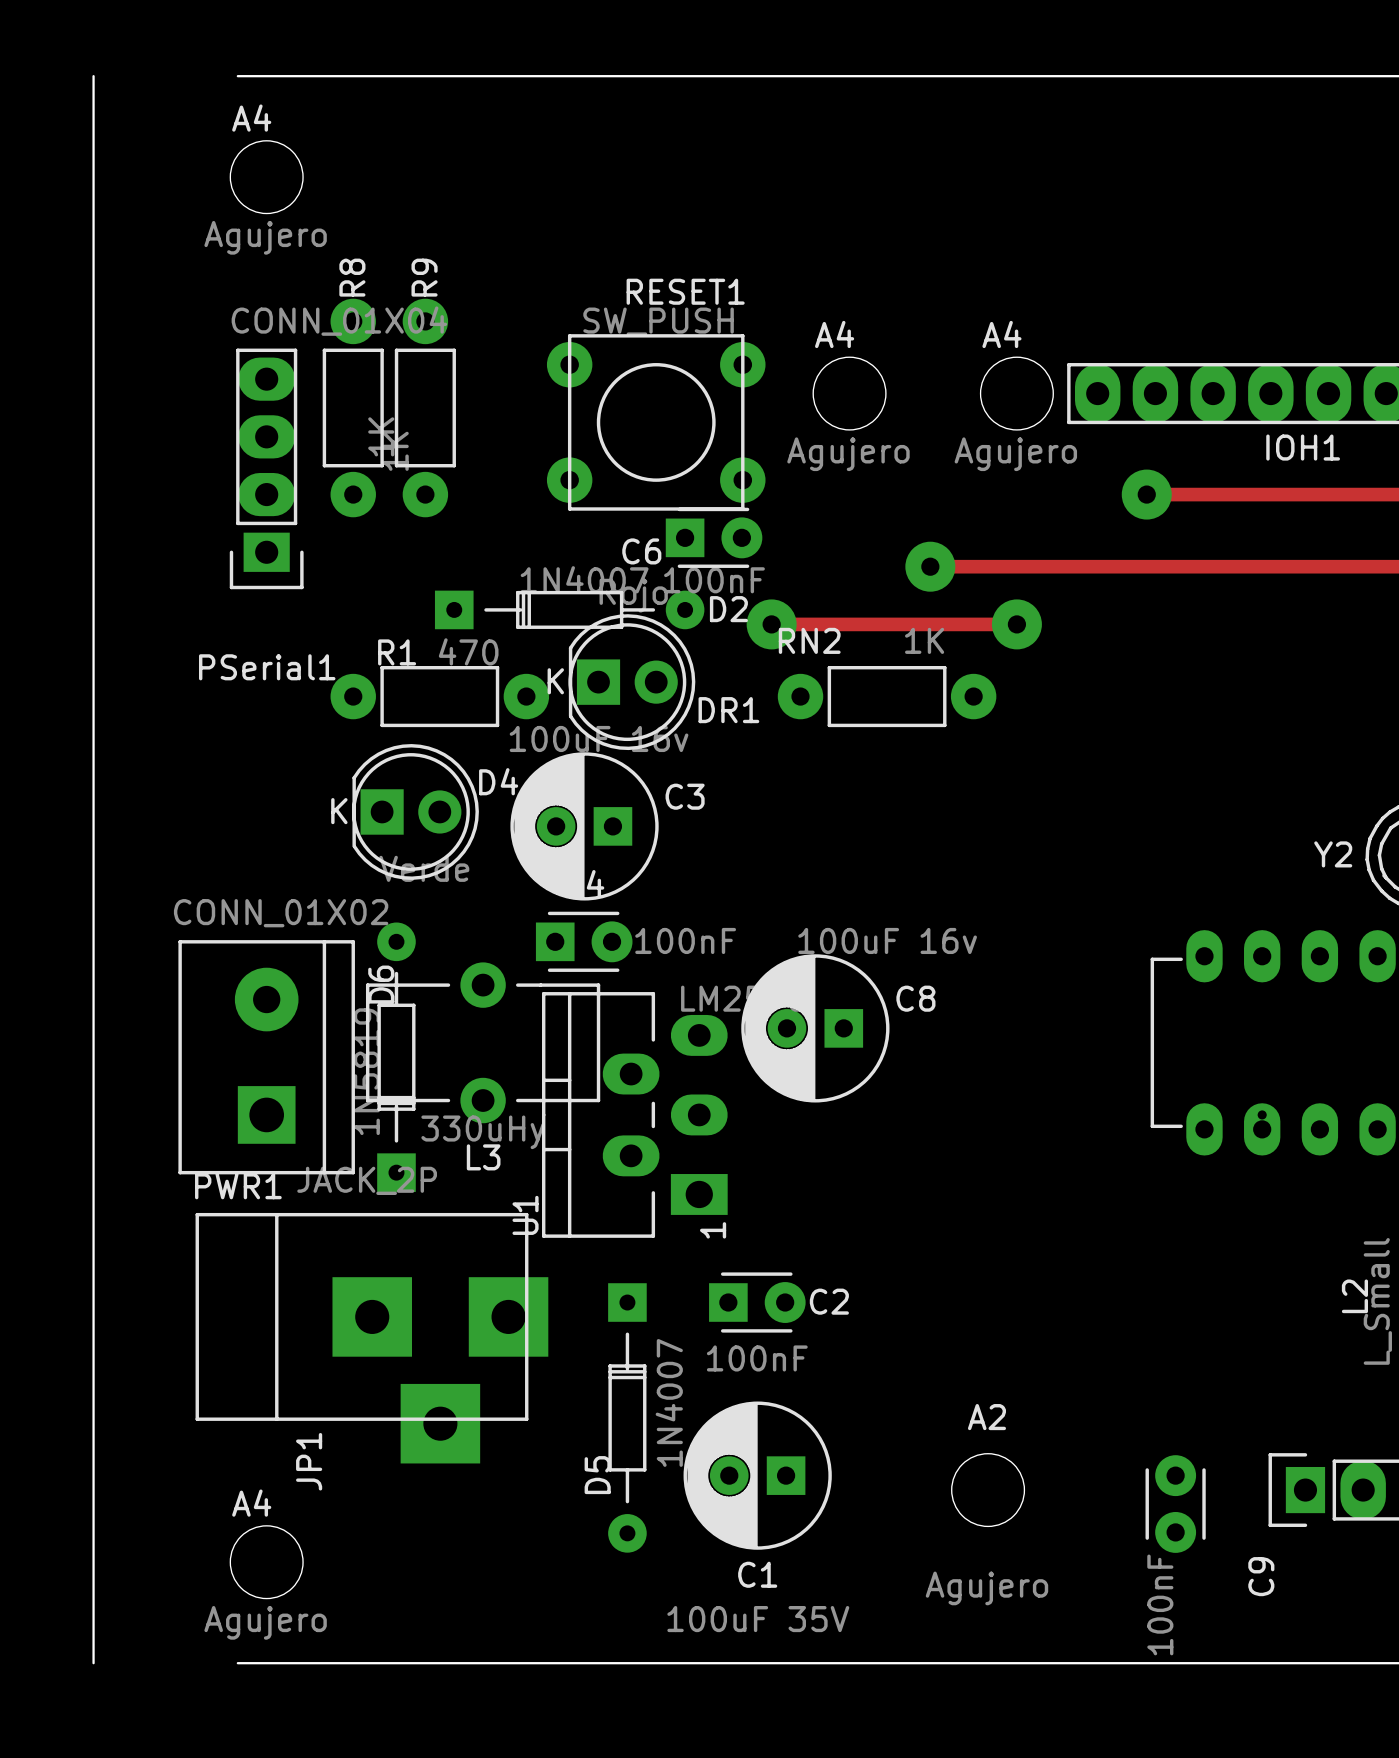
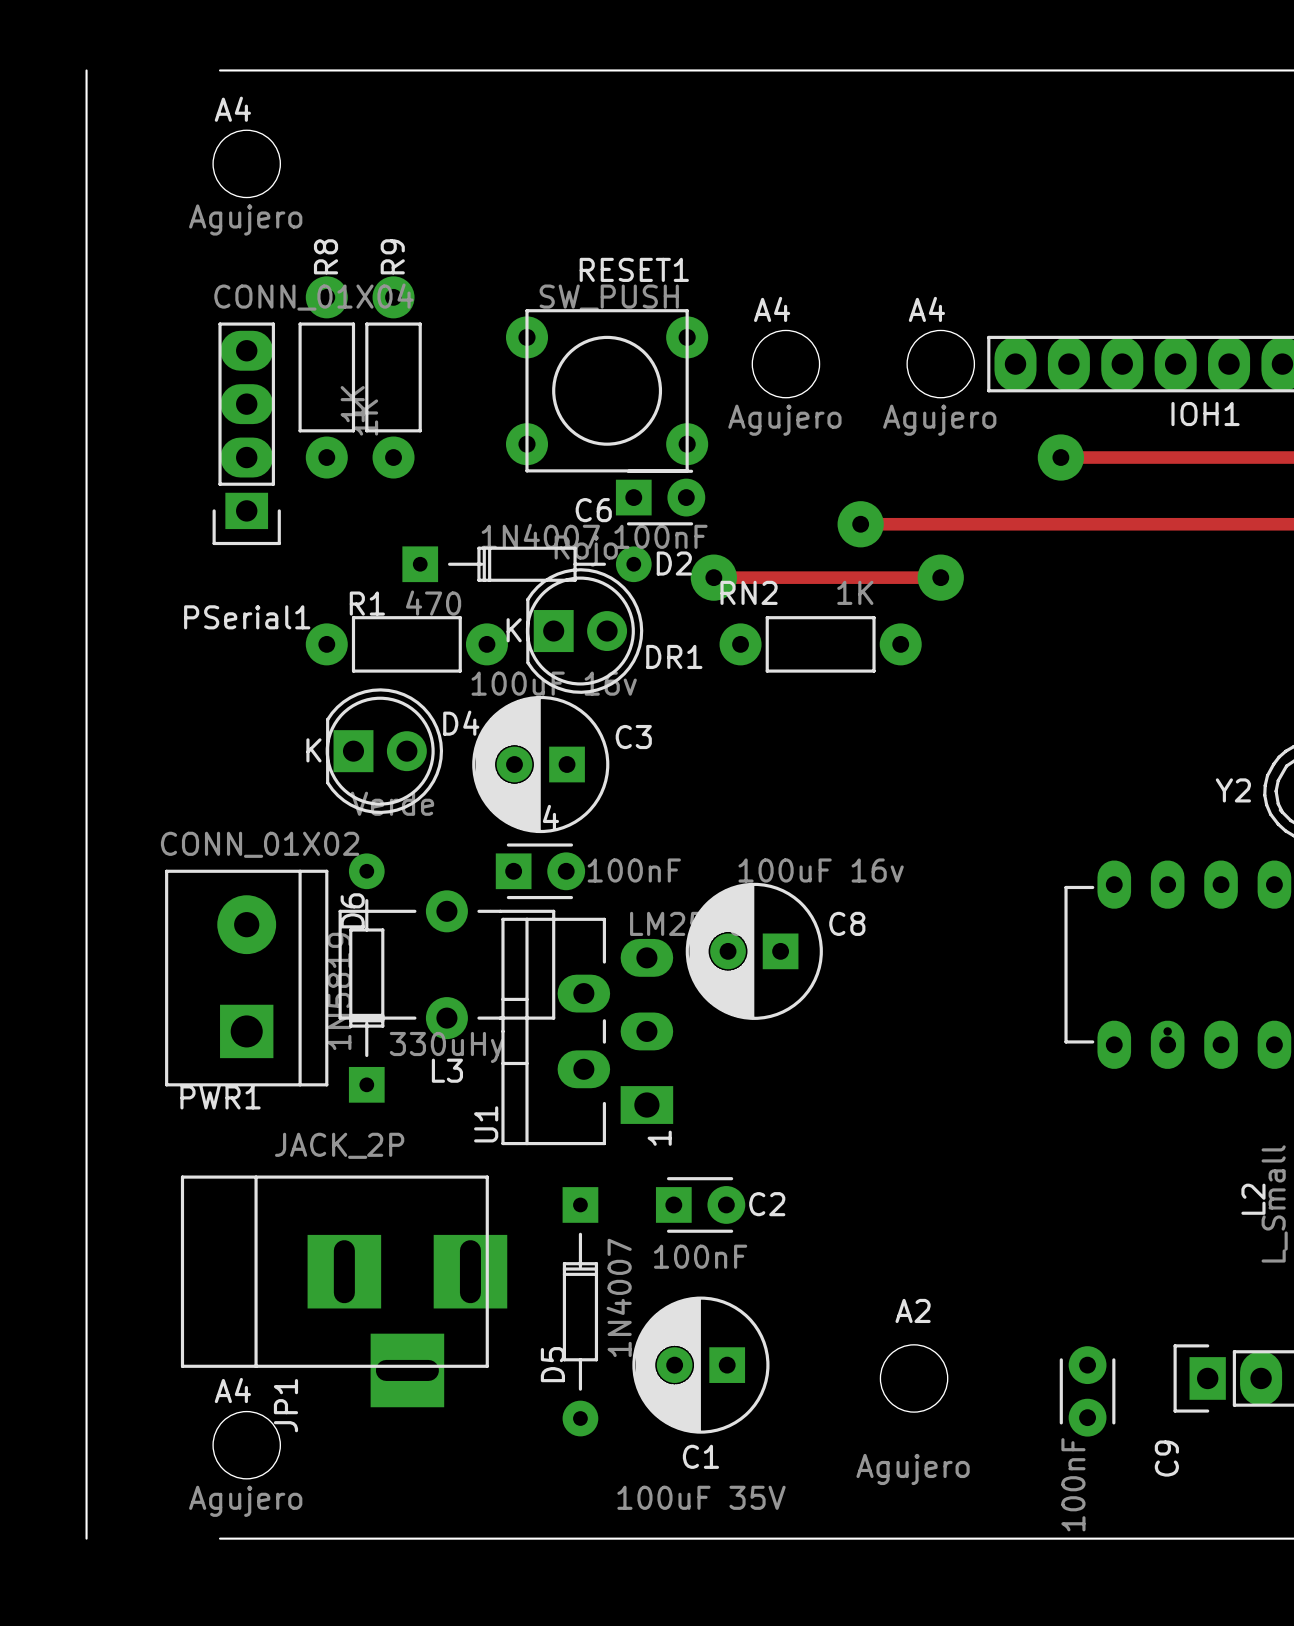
JP1 footprint: [195, 1212, 549, 1464] -> [180, 1175, 508, 1408]

